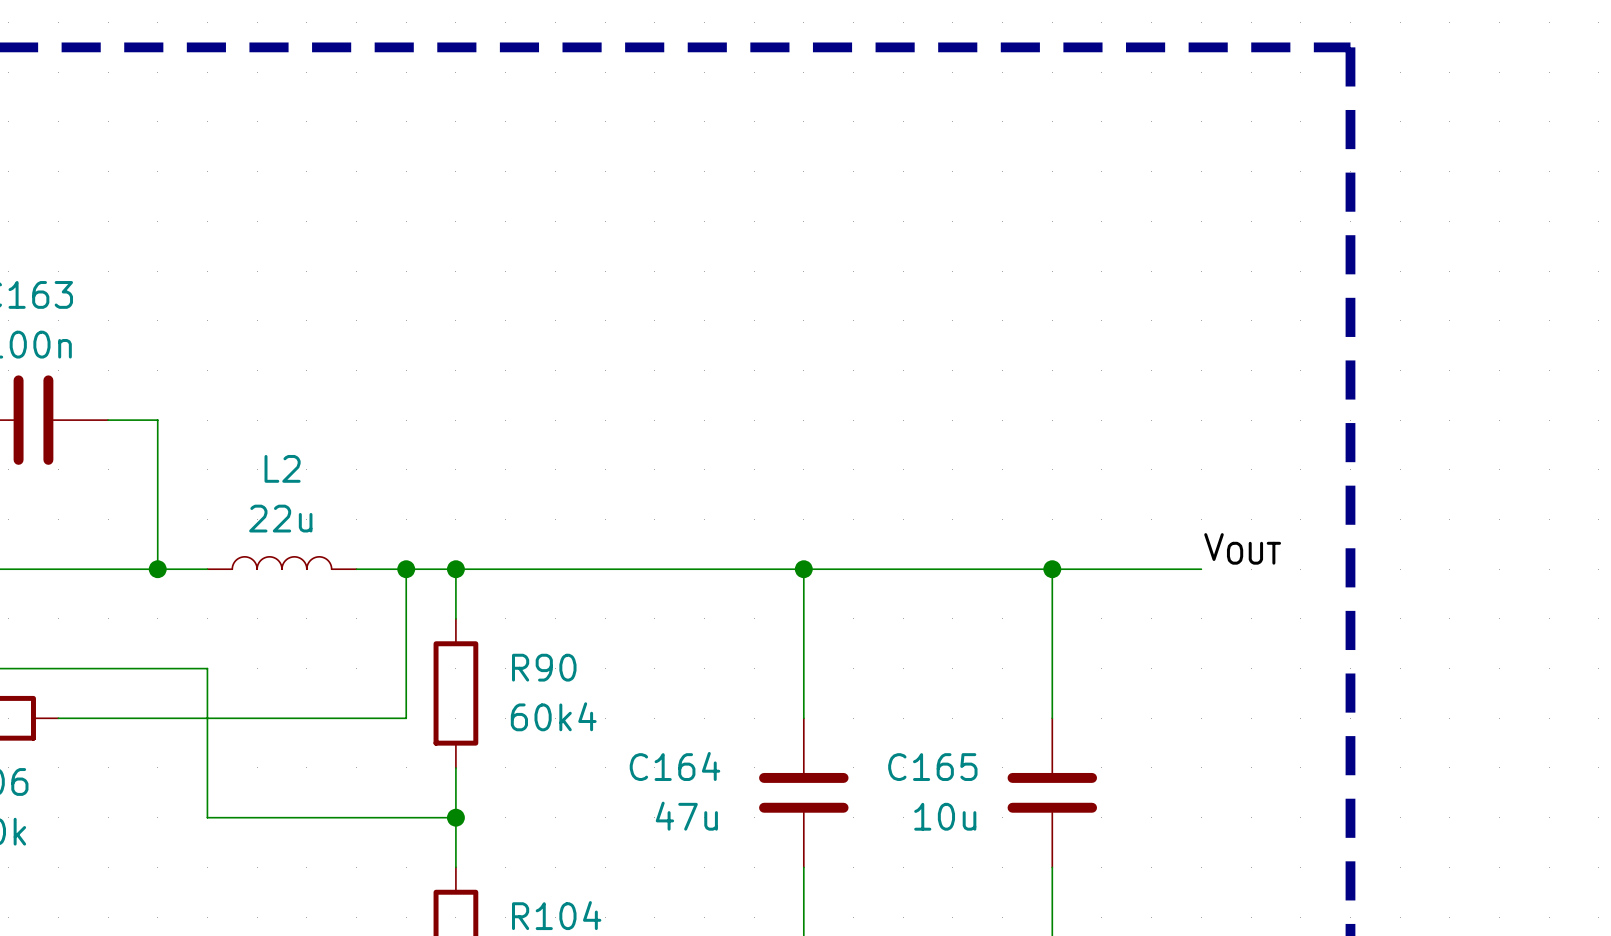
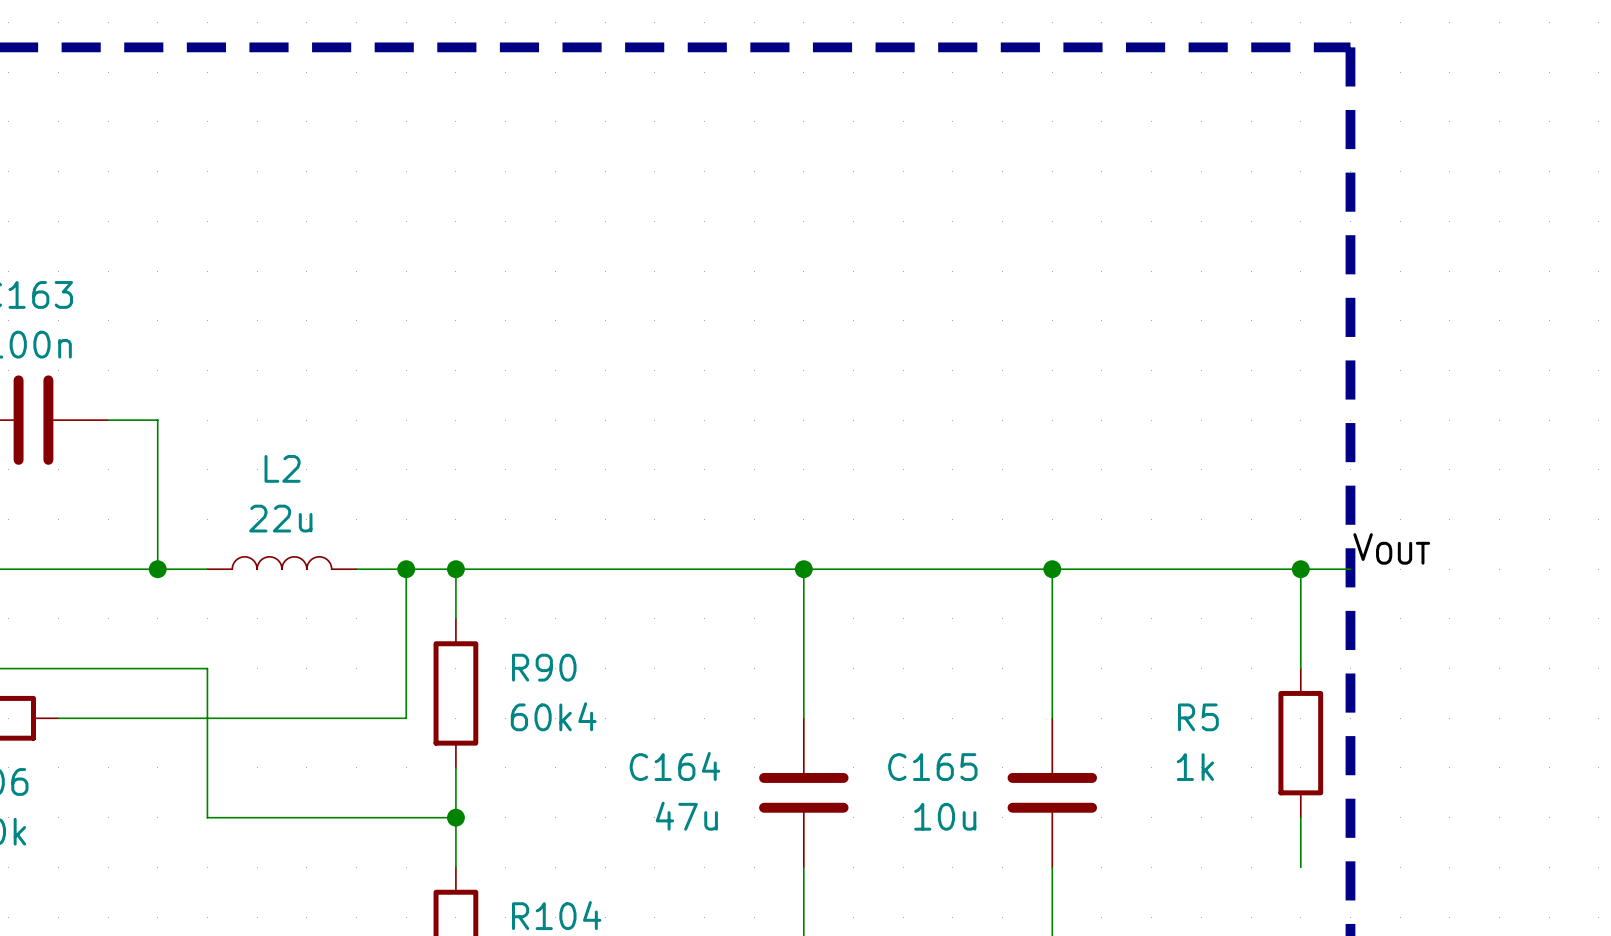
label position: VOUT (1242, 548) -> VOUT (1391, 548)
wire: none -> (1201, 569) (1350, 569)
wire: none -> (1300, 569) (1300, 668)
junction: none -> (1300, 569)
R5: none -> 1k (1300, 743)
wire: none -> (1300, 817) (1300, 867)

